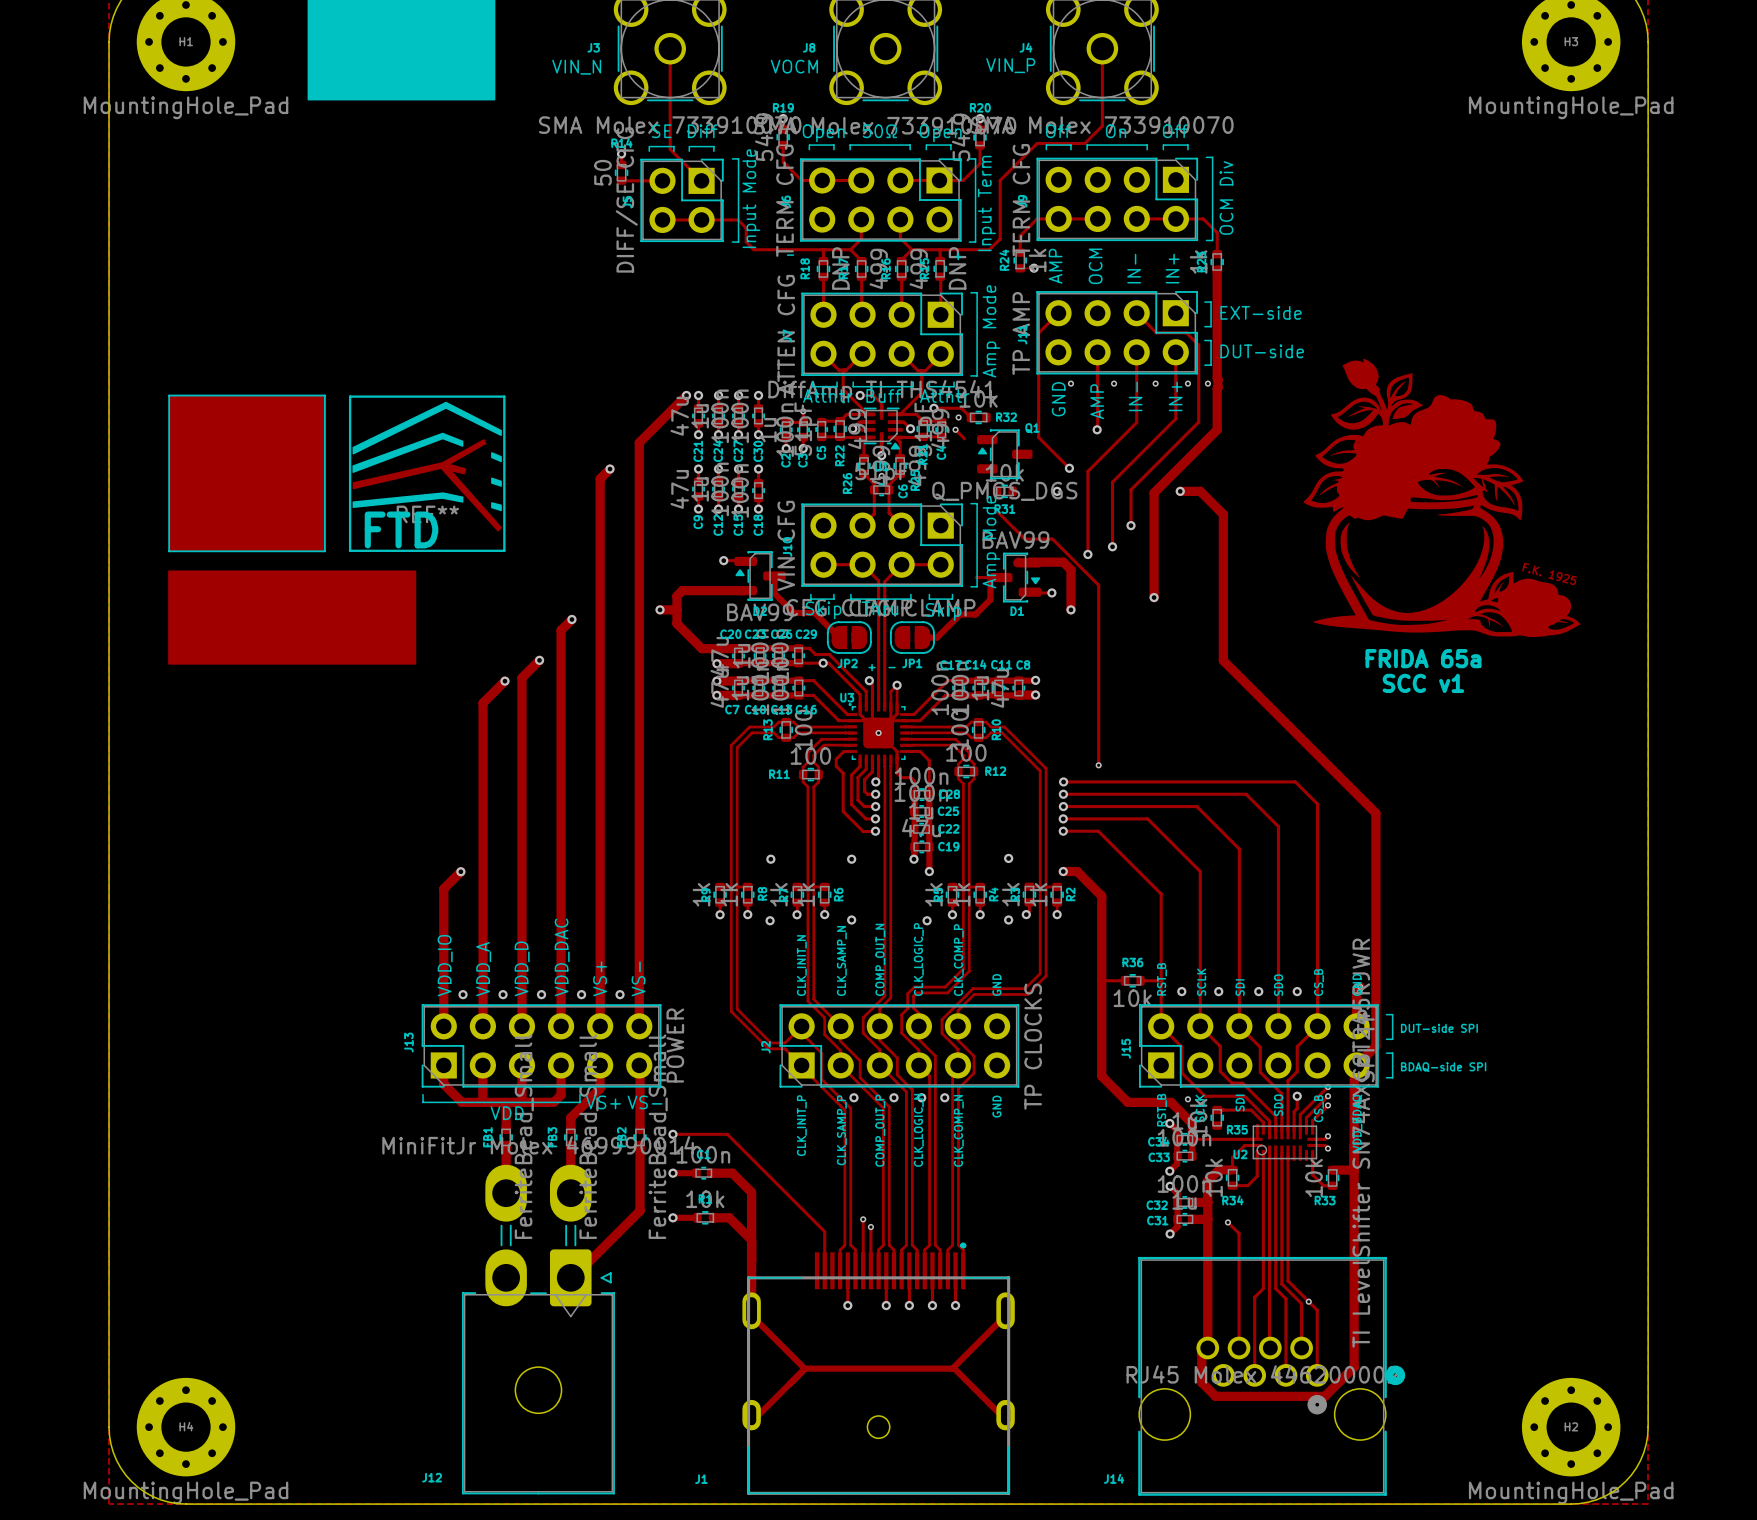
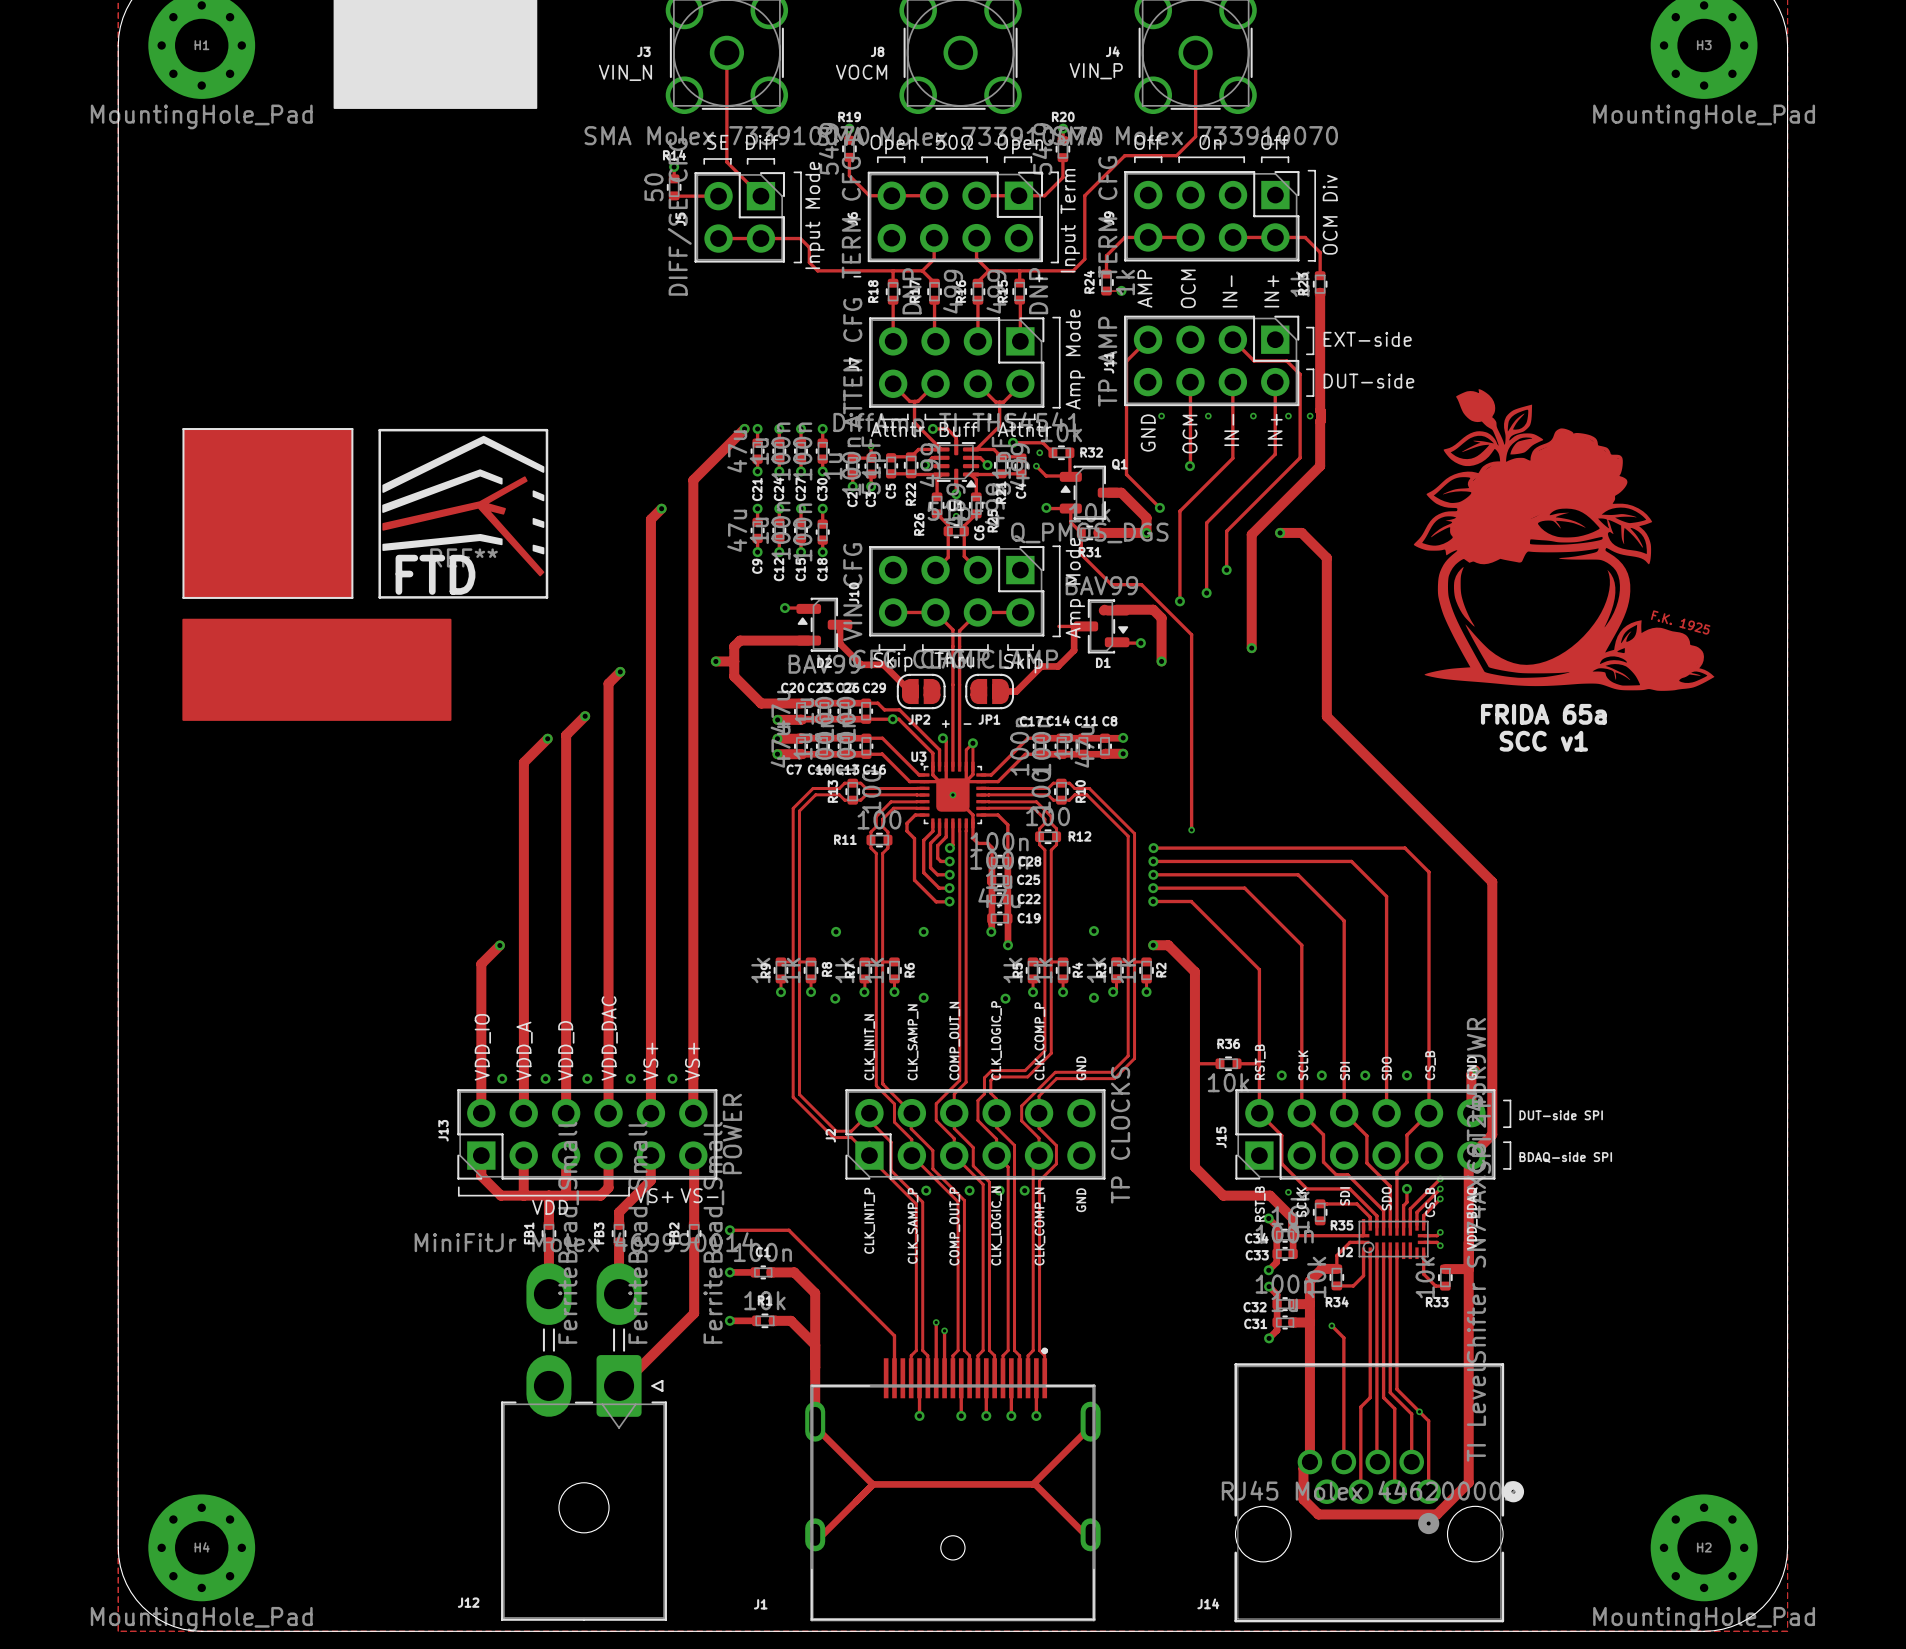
text: AMP (1097, 401) -> OCM (1189, 434)
track: none -> (1069, 452) (1069, 475) (1046, 476)
track: none -> (1108, 492) (1121, 492) (1146, 517) (1146, 532) (1098, 532)
track: none -> (1046, 507) (1070, 508) (1070, 522) (1081, 532) (1081, 554)
via: none -> (1046, 507)
text: VS- (638, 978) -> VS+ (692, 1061)

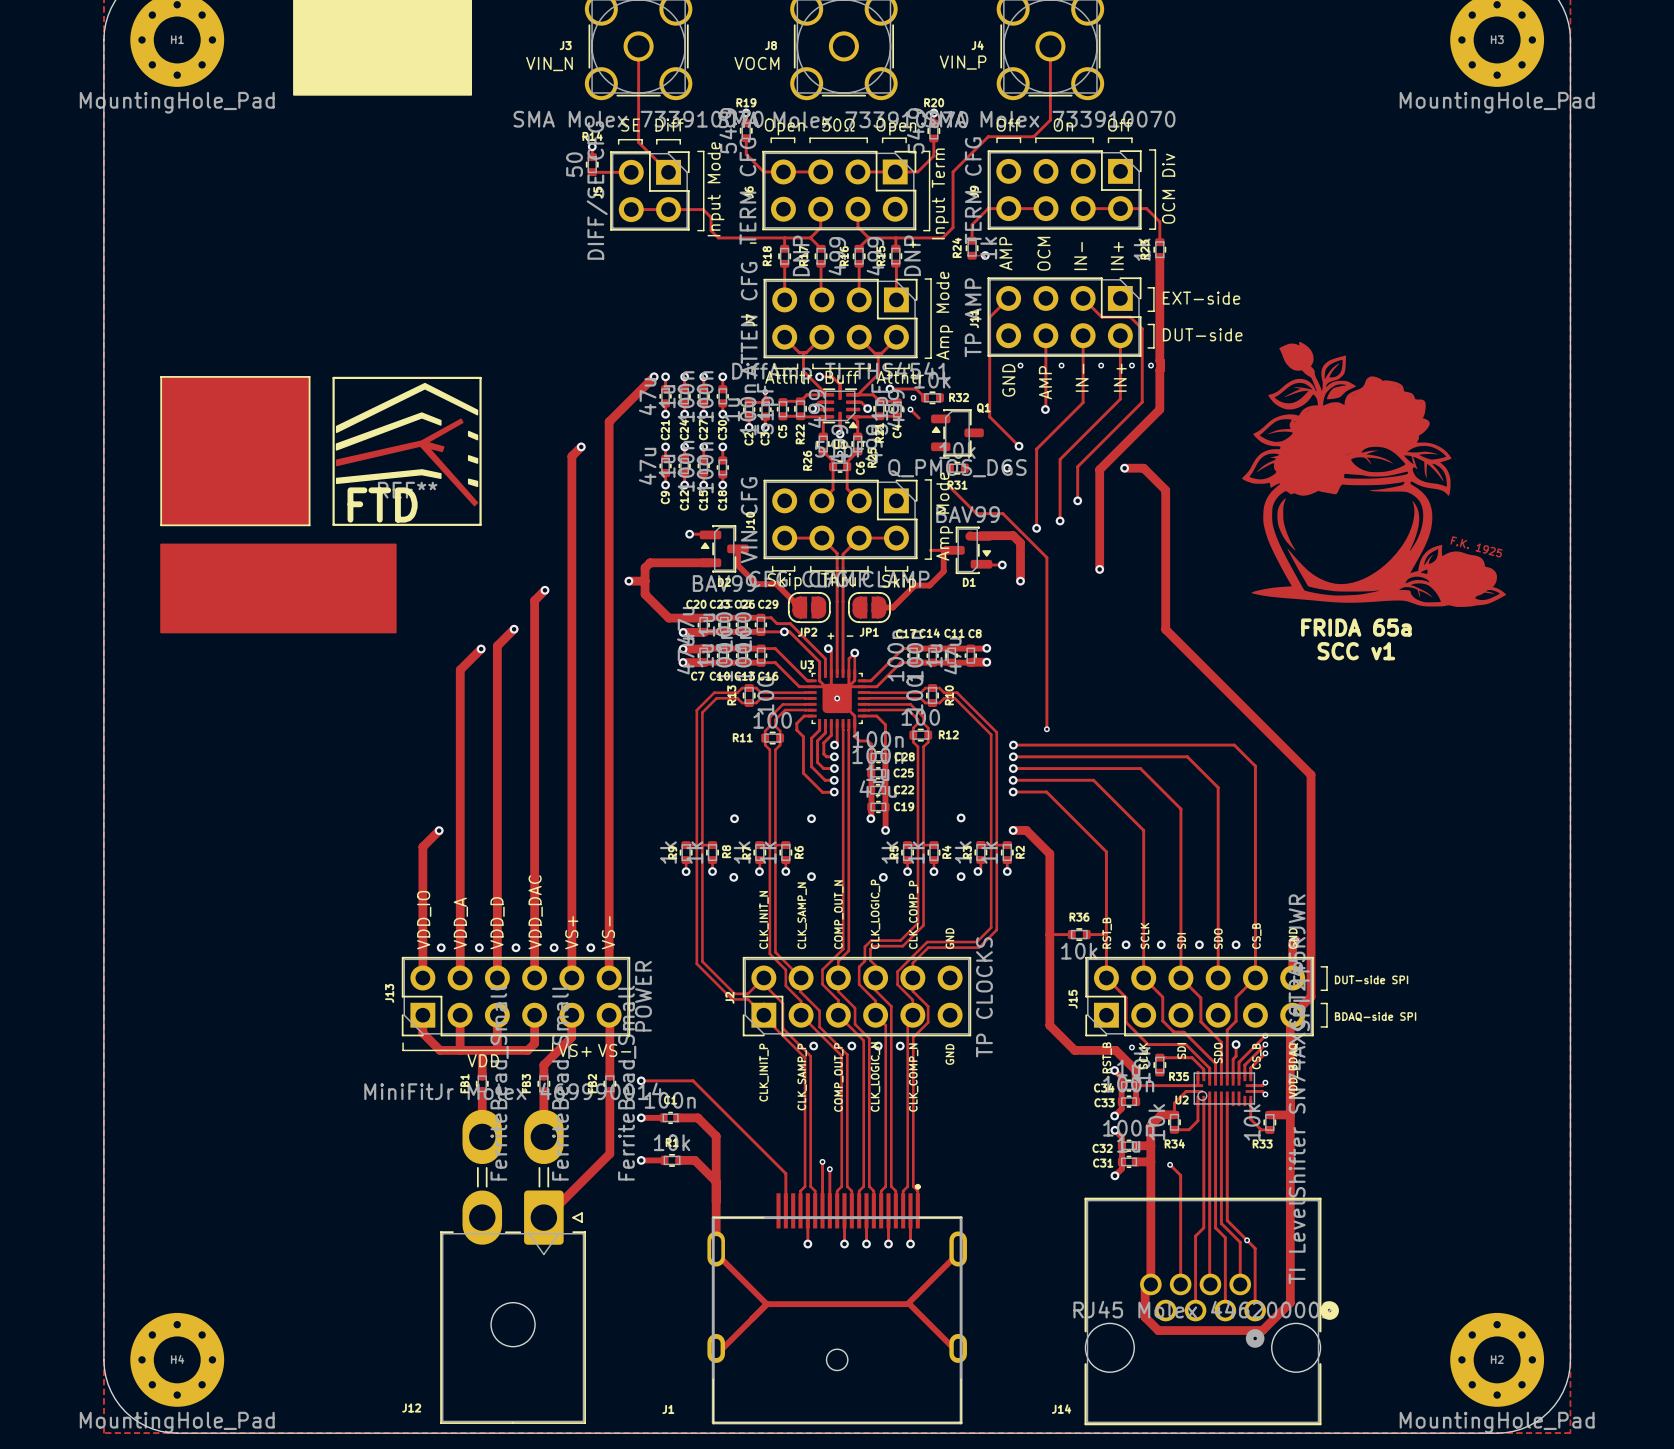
text: OCM (1189, 434) -> AMP (1045, 382)
track: (1069, 452) (1069, 475) (1046, 476) -> none
track: (1108, 492) (1121, 492) (1146, 517) (1146, 532) (1098, 532) -> none
track: (1046, 507) (1070, 508) (1070, 522) (1081, 532) (1081, 554) -> none
via: (1046, 507) -> none
text: VS+ (692, 1061) -> VS- (608, 932)

